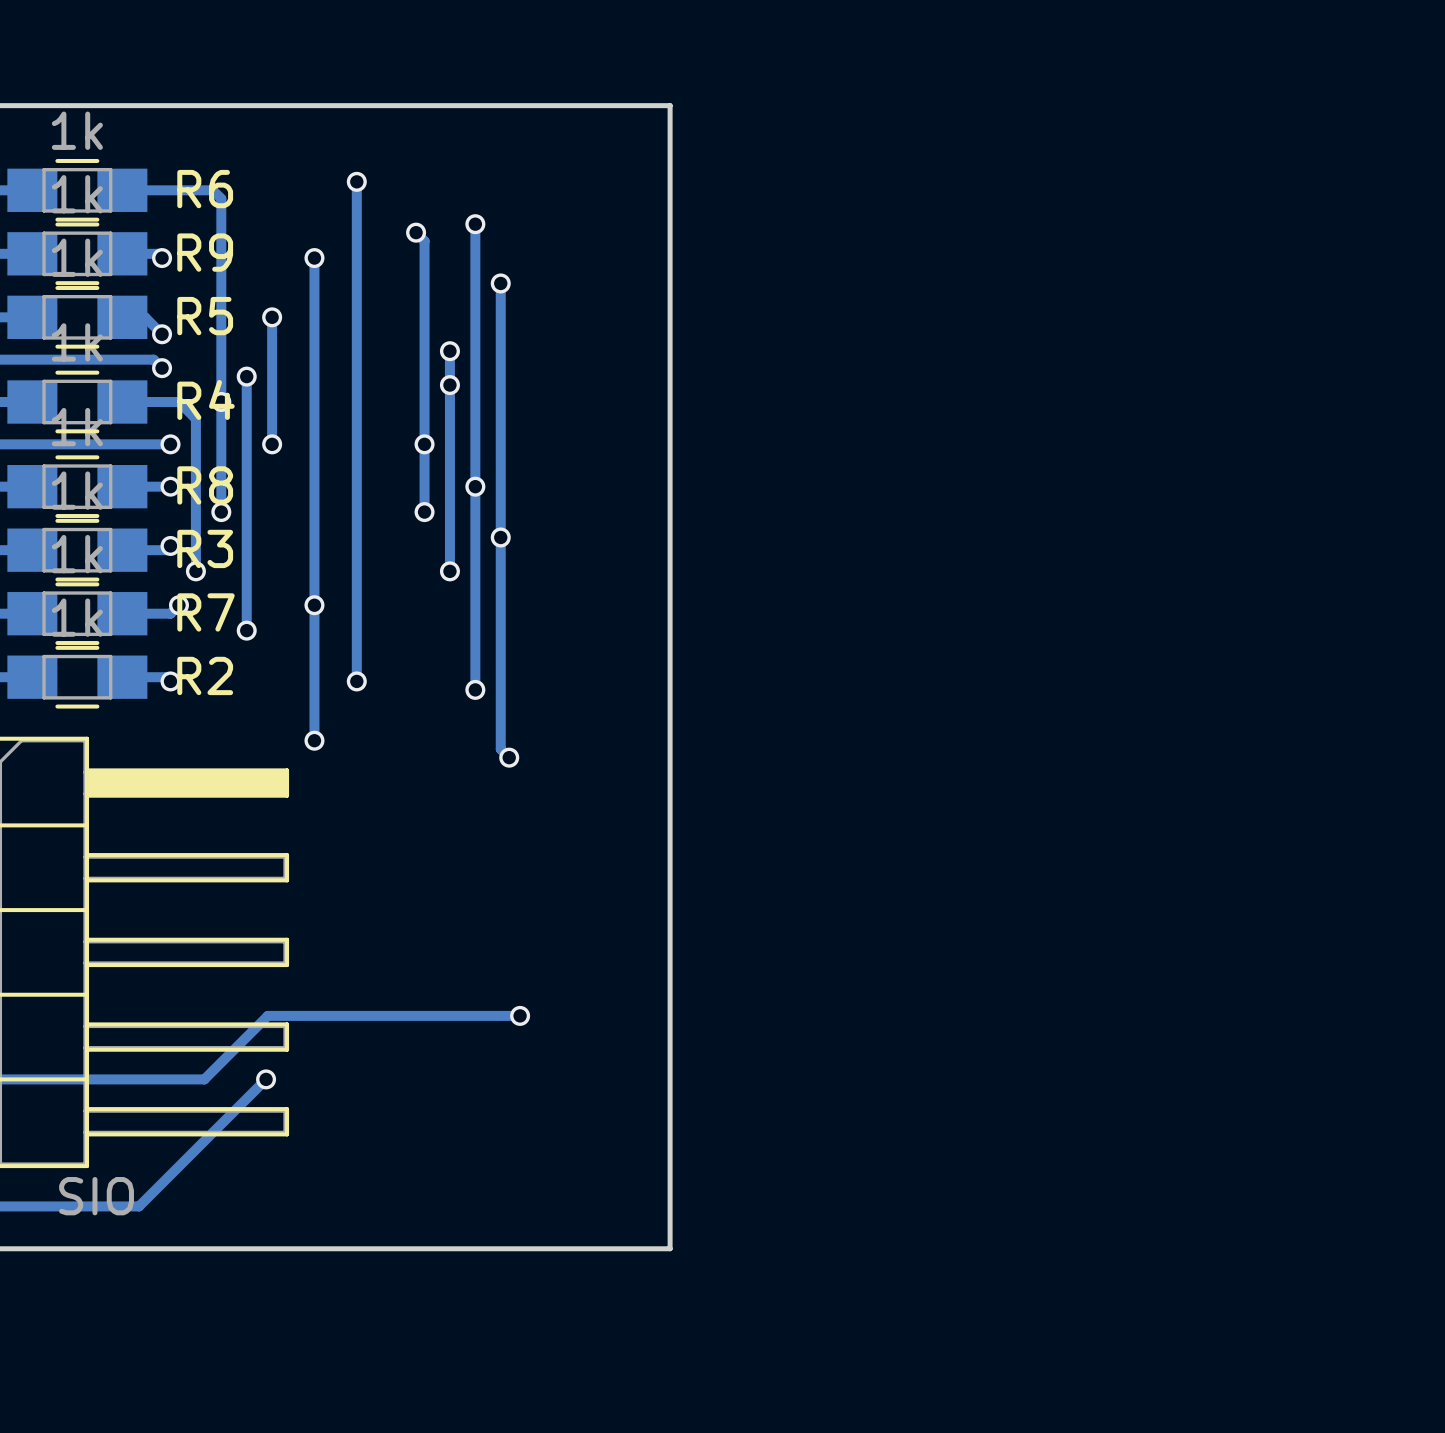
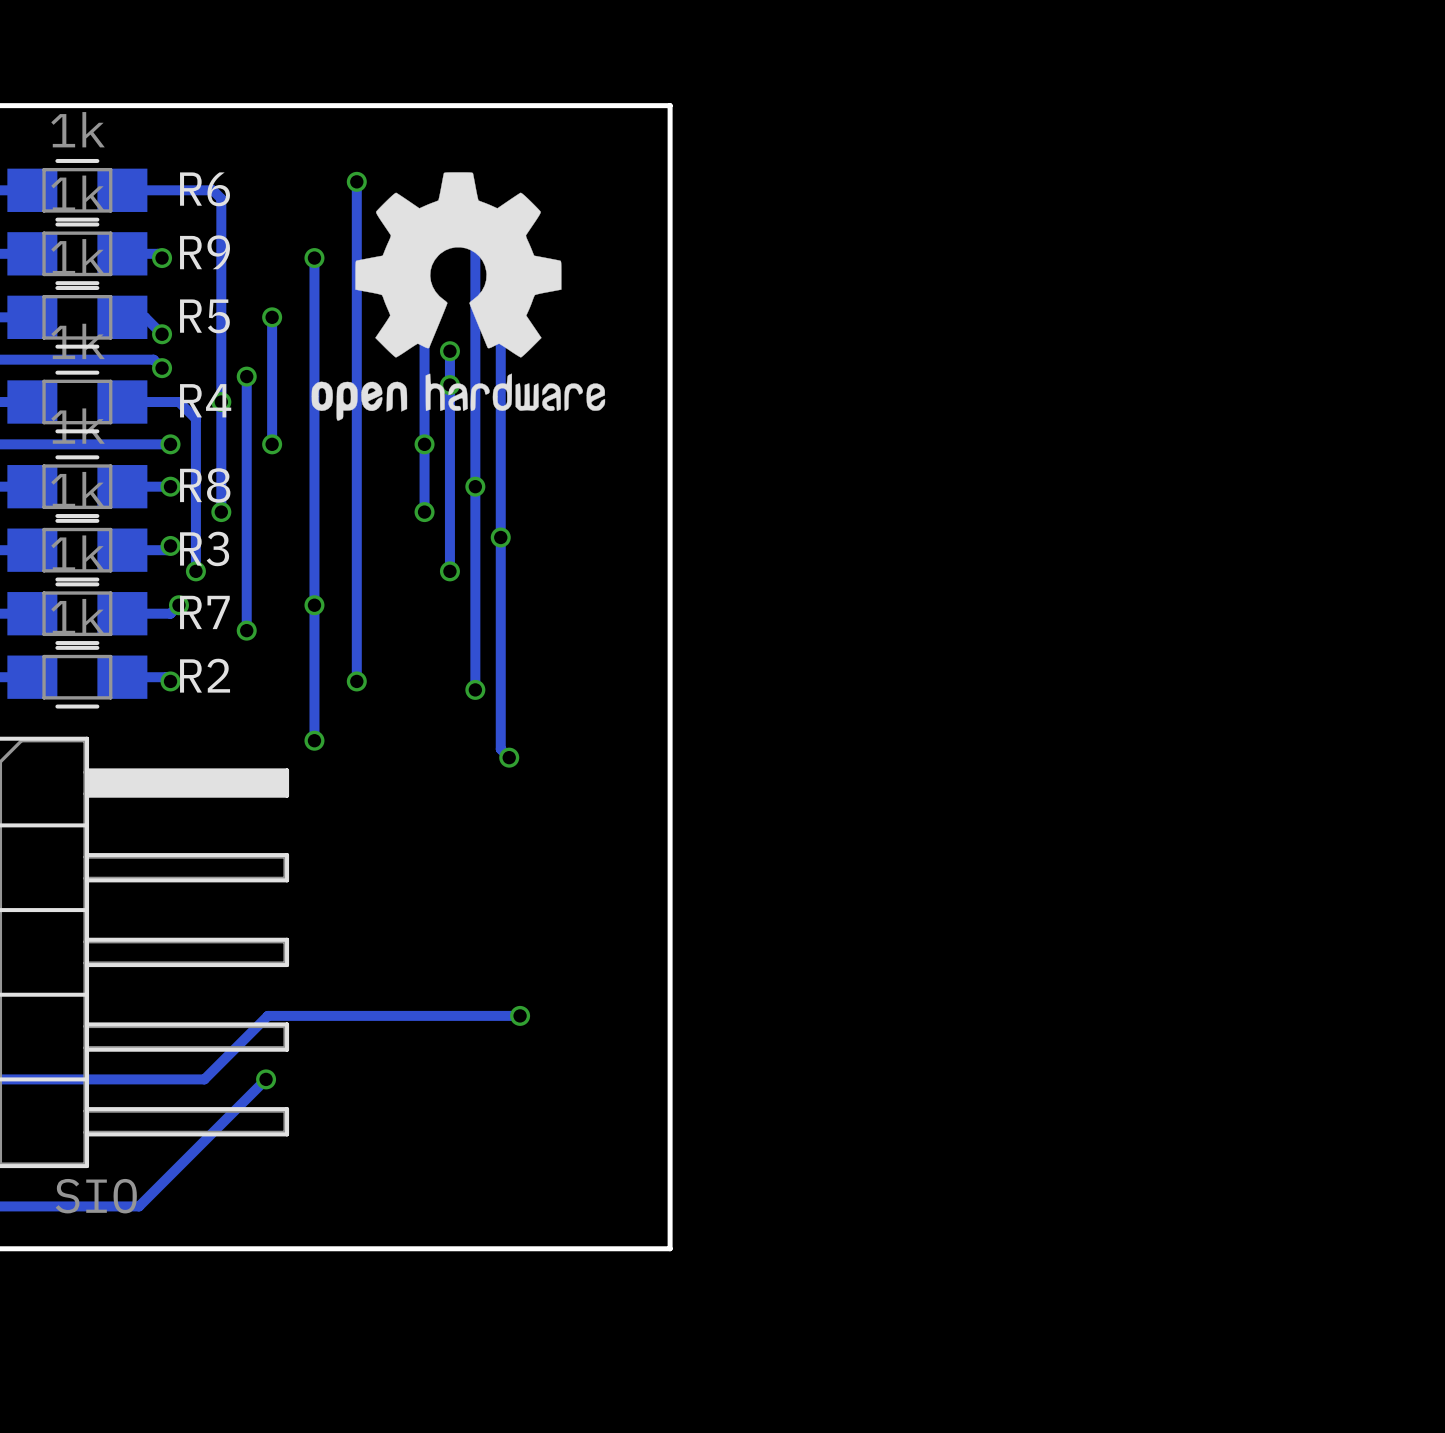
drawing: none -> [311, 172, 606, 421]

